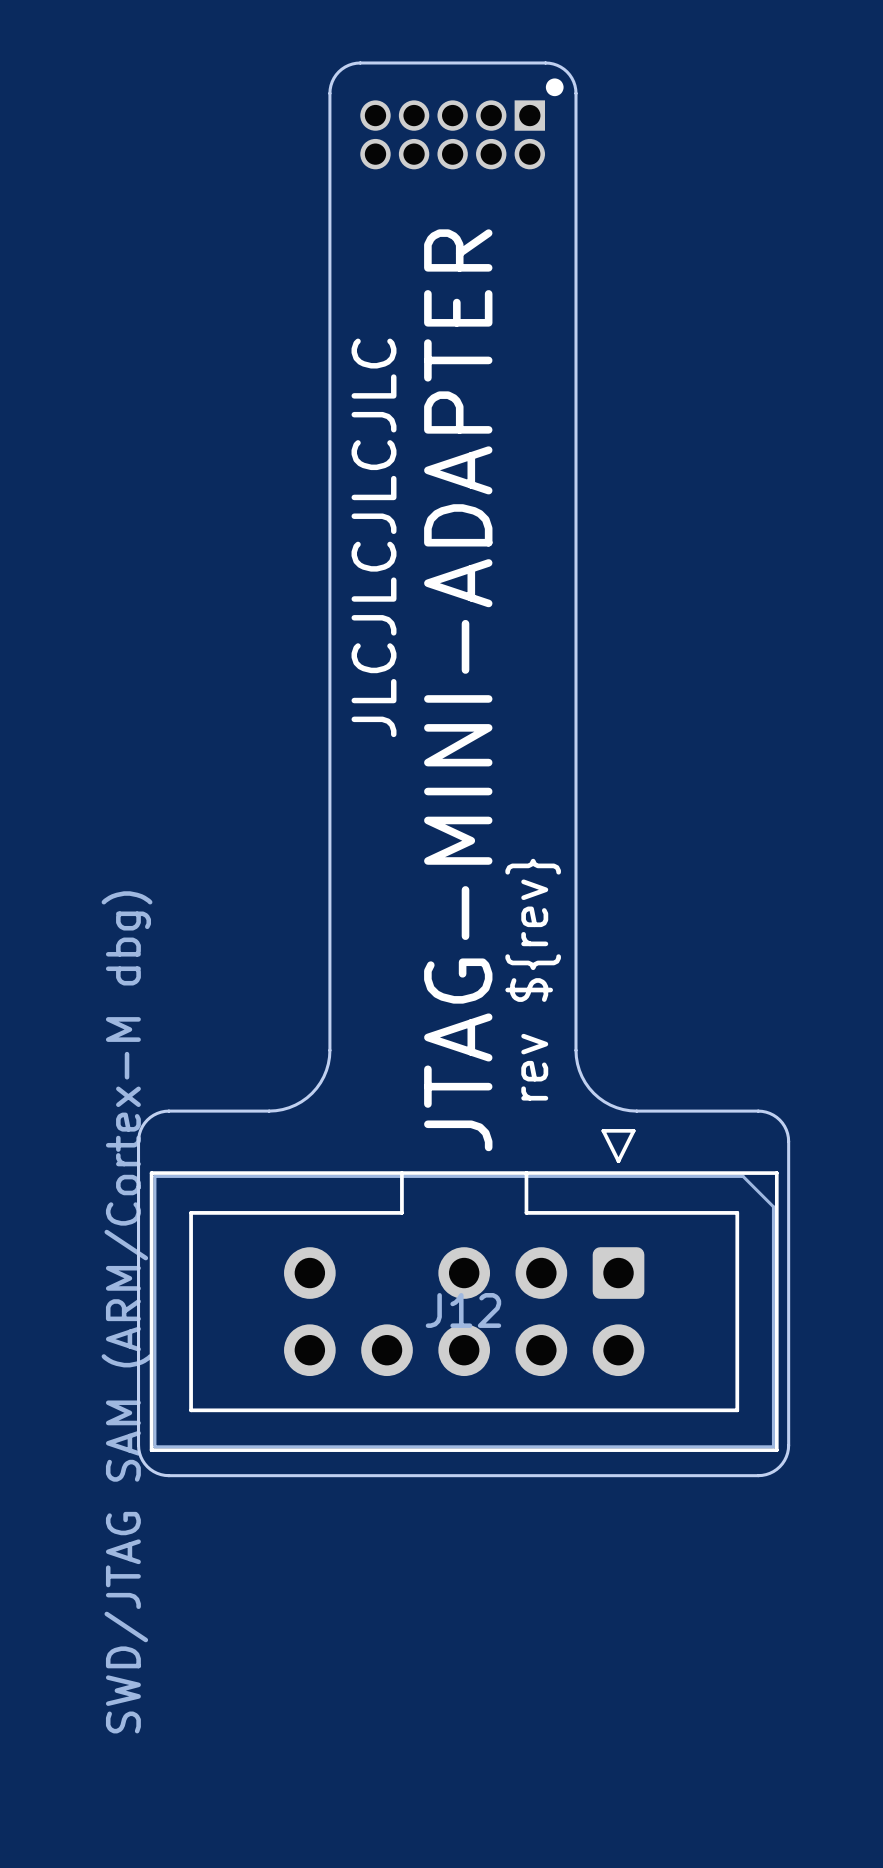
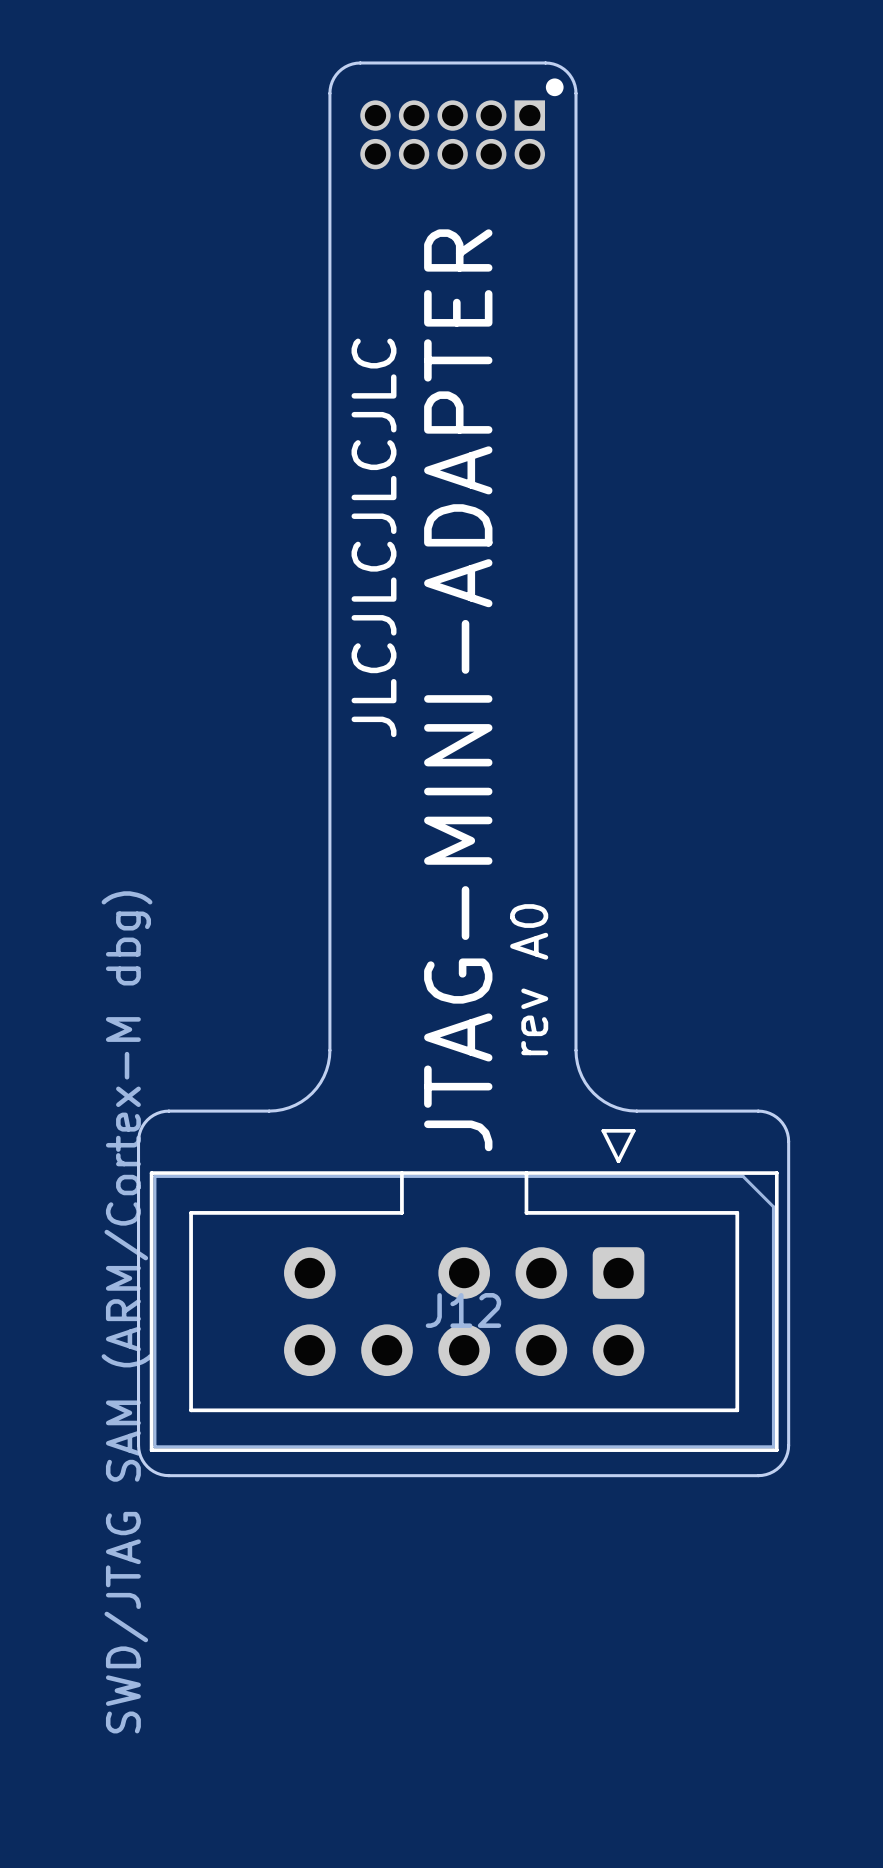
text: rev ${rev} (533, 979) -> rev A0 (529, 979)

